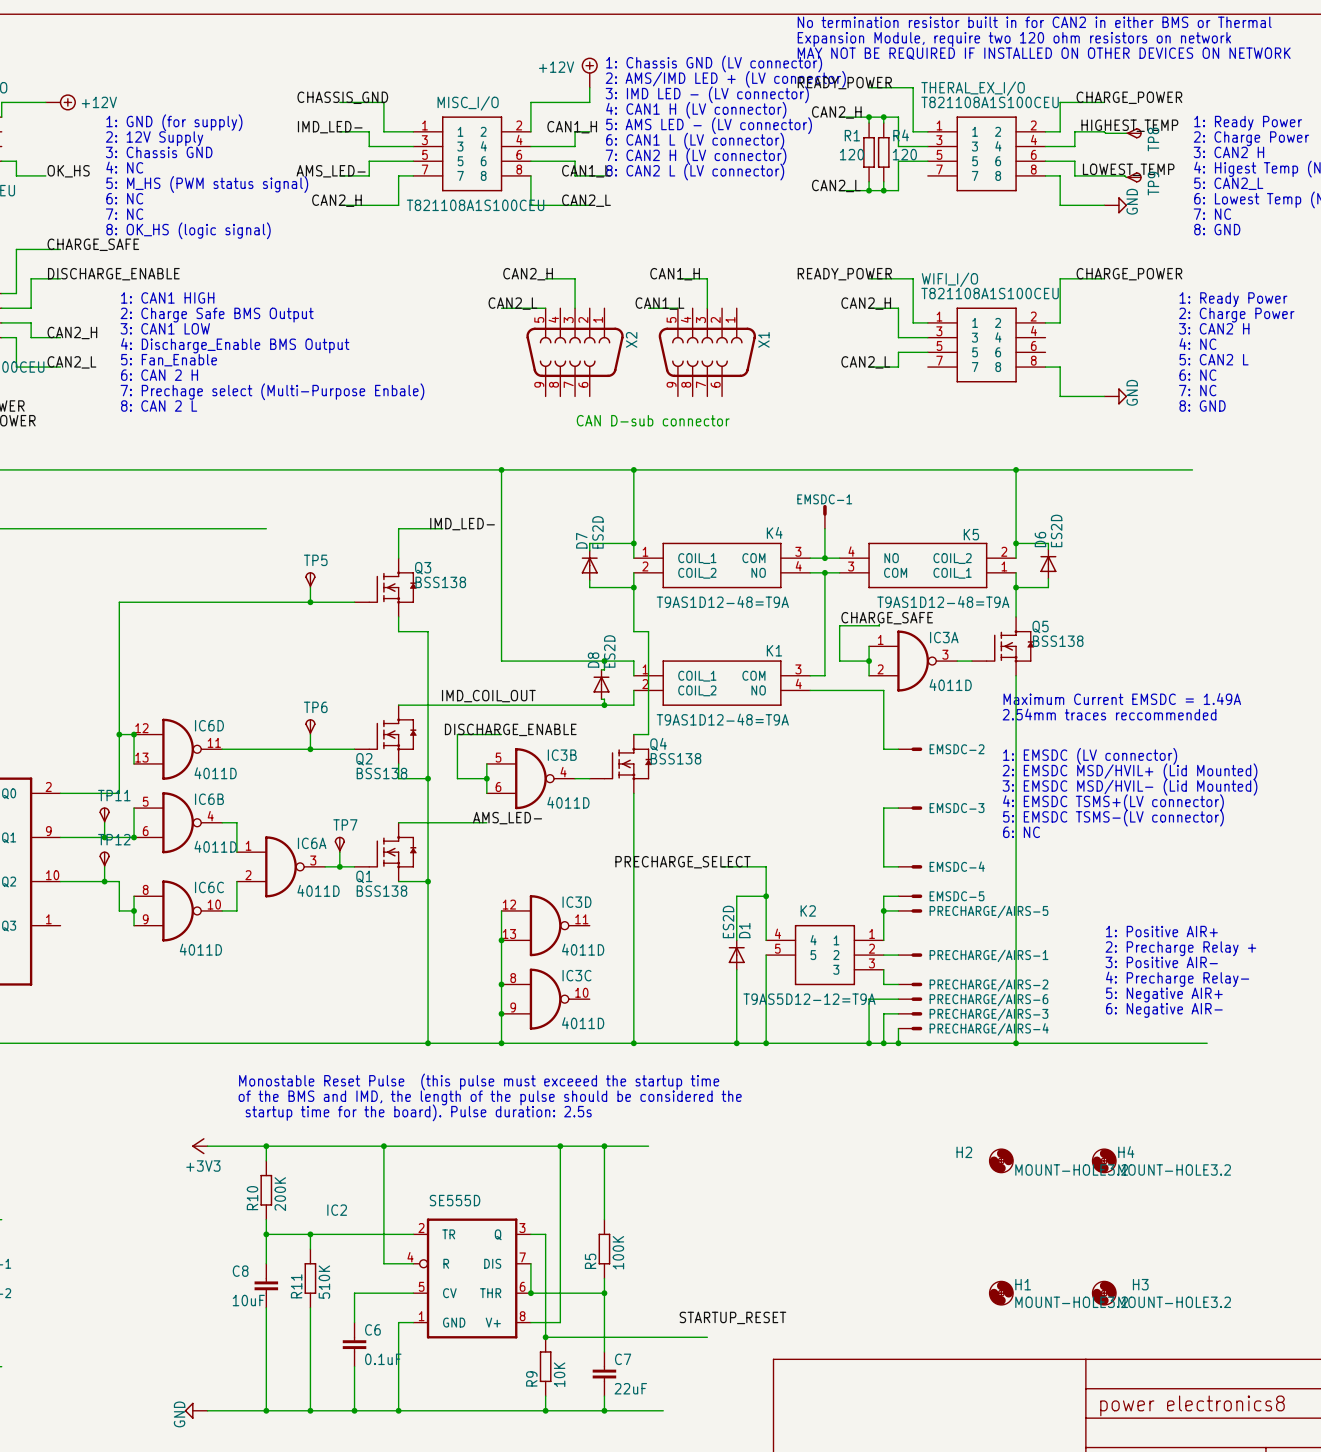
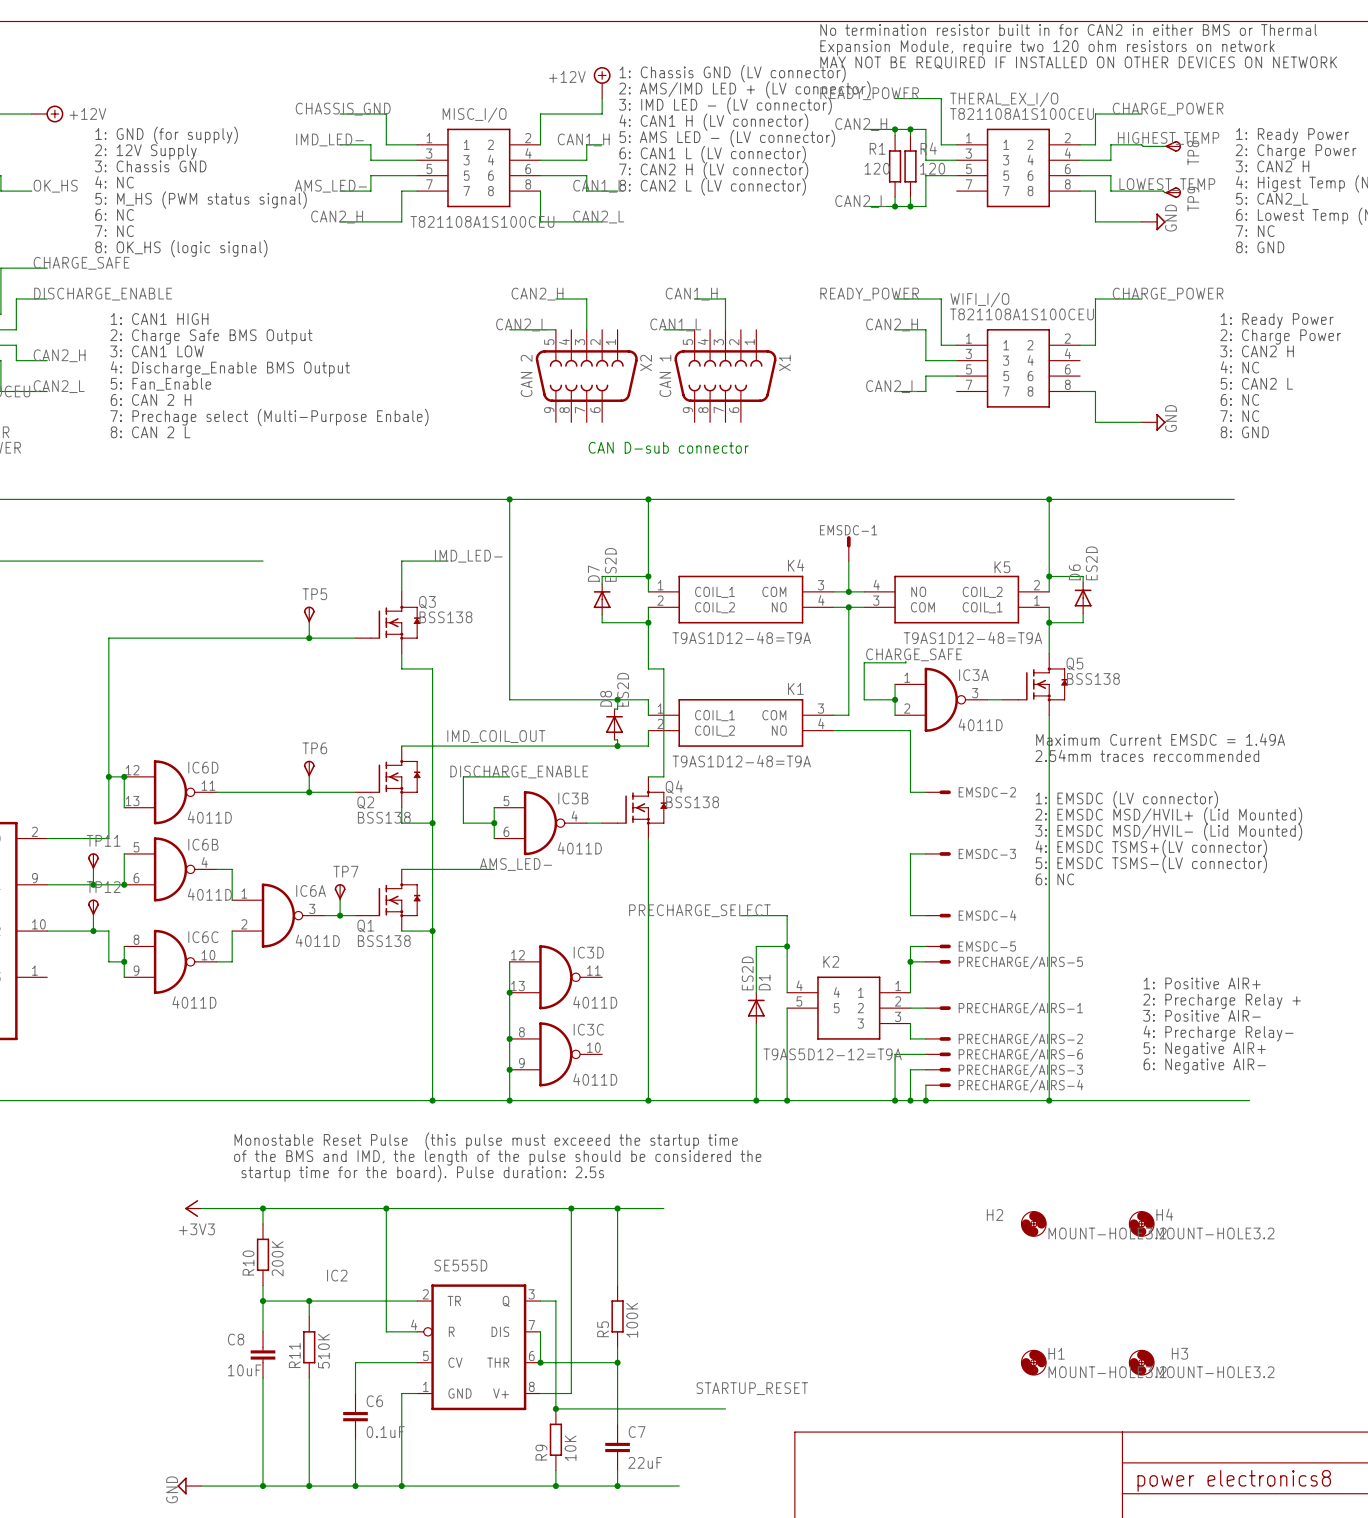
X2 value: none -> CAN 2 (526, 375)
X1 value: none -> CAN 1 (665, 375)

